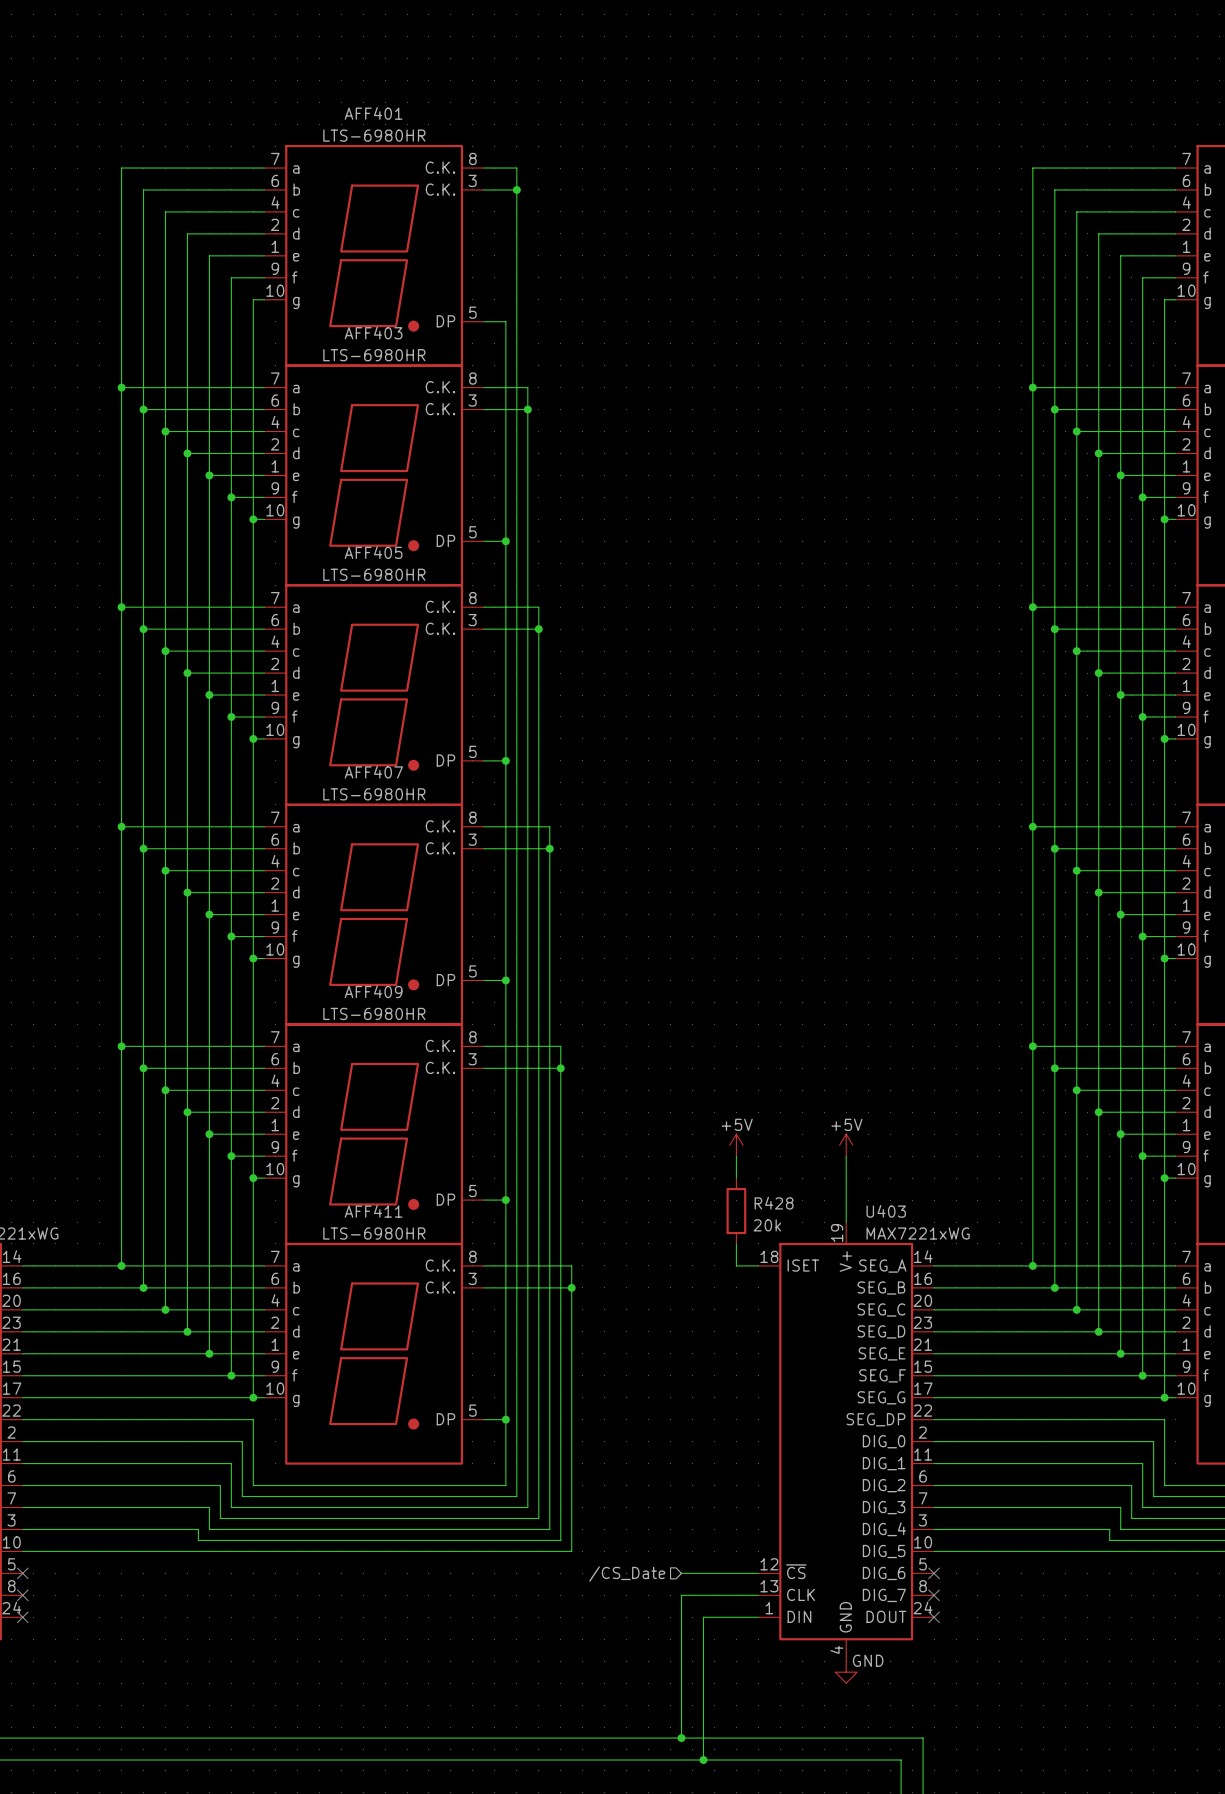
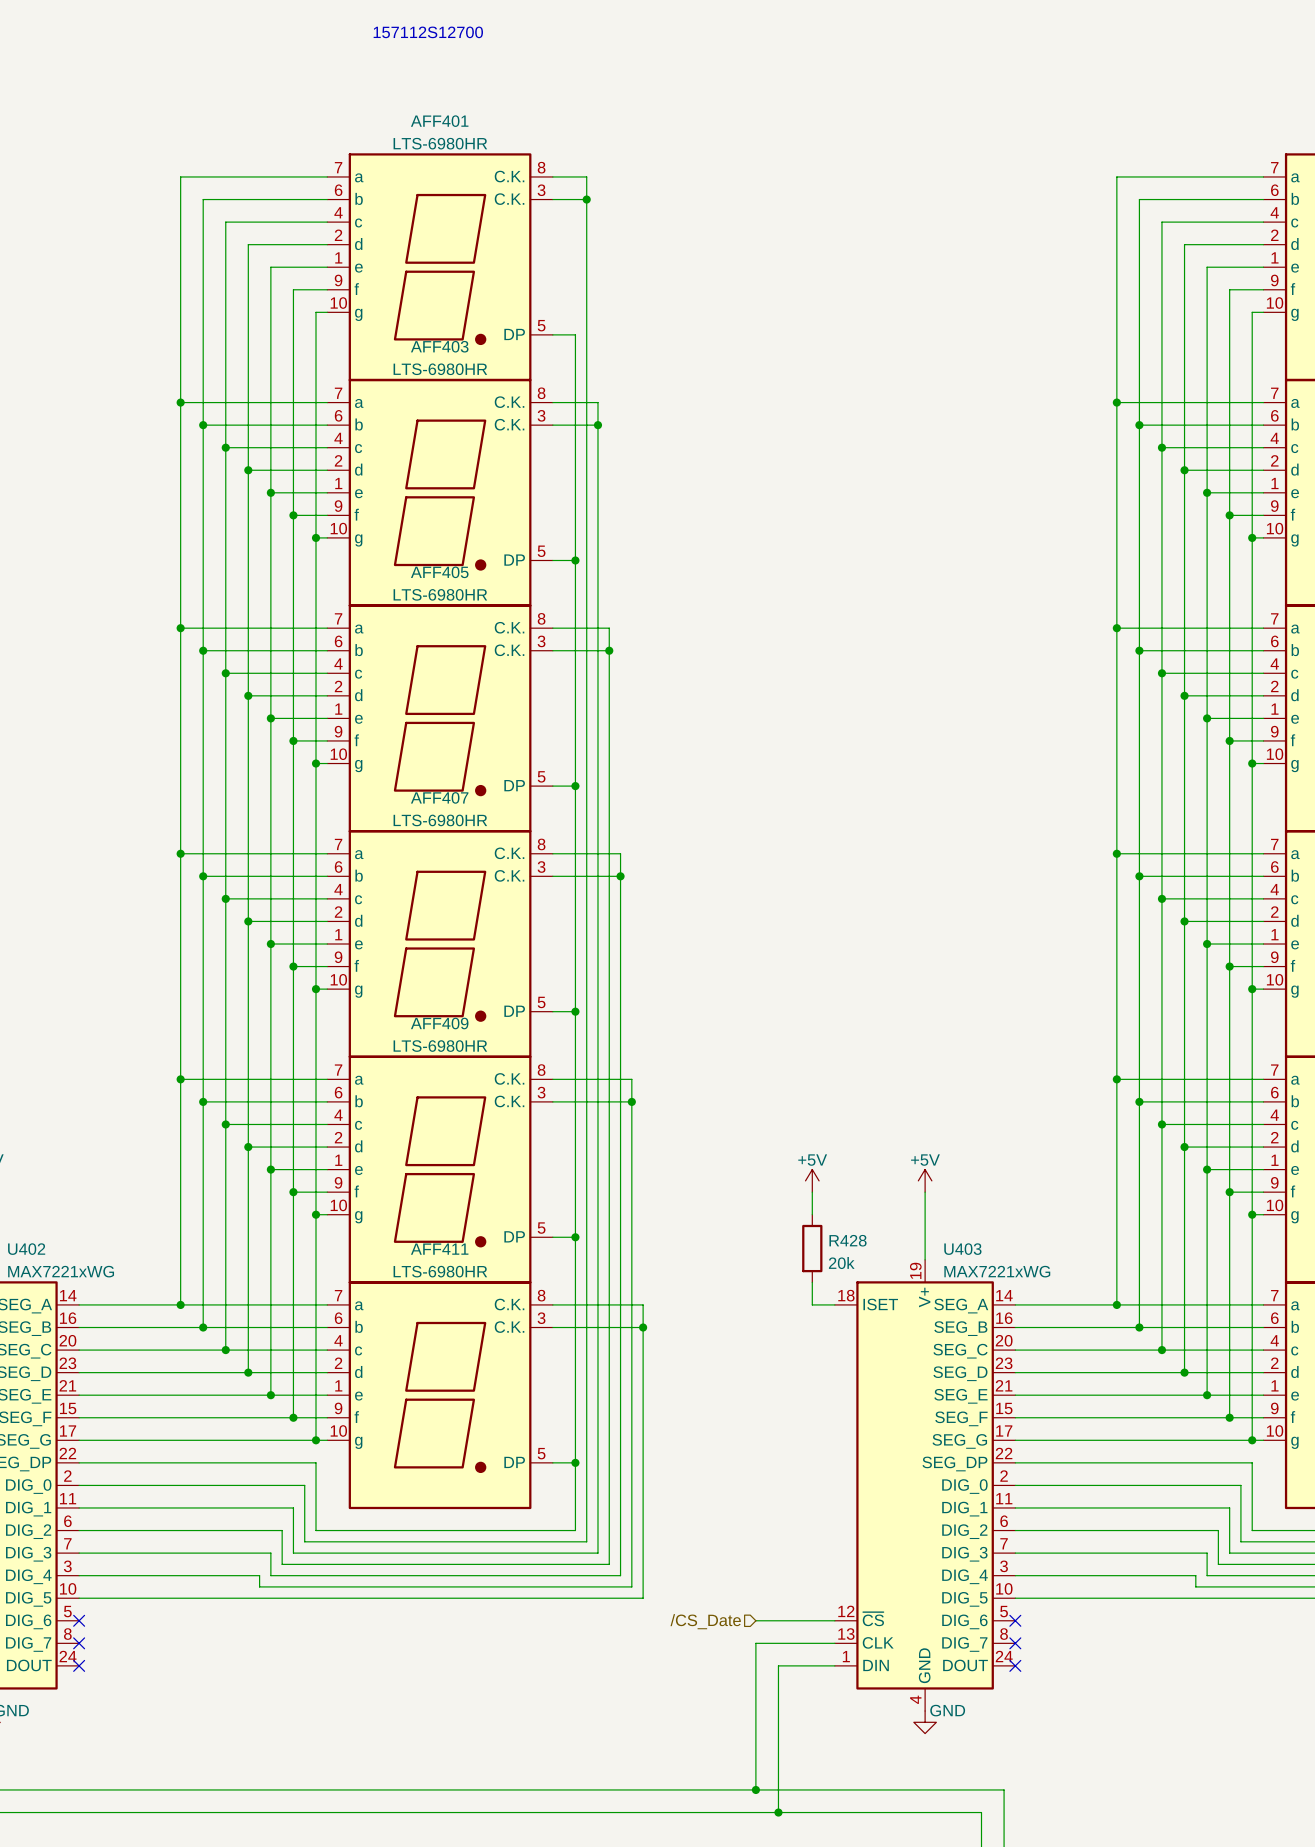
text: none -> 157112S12700 (428, 32)

